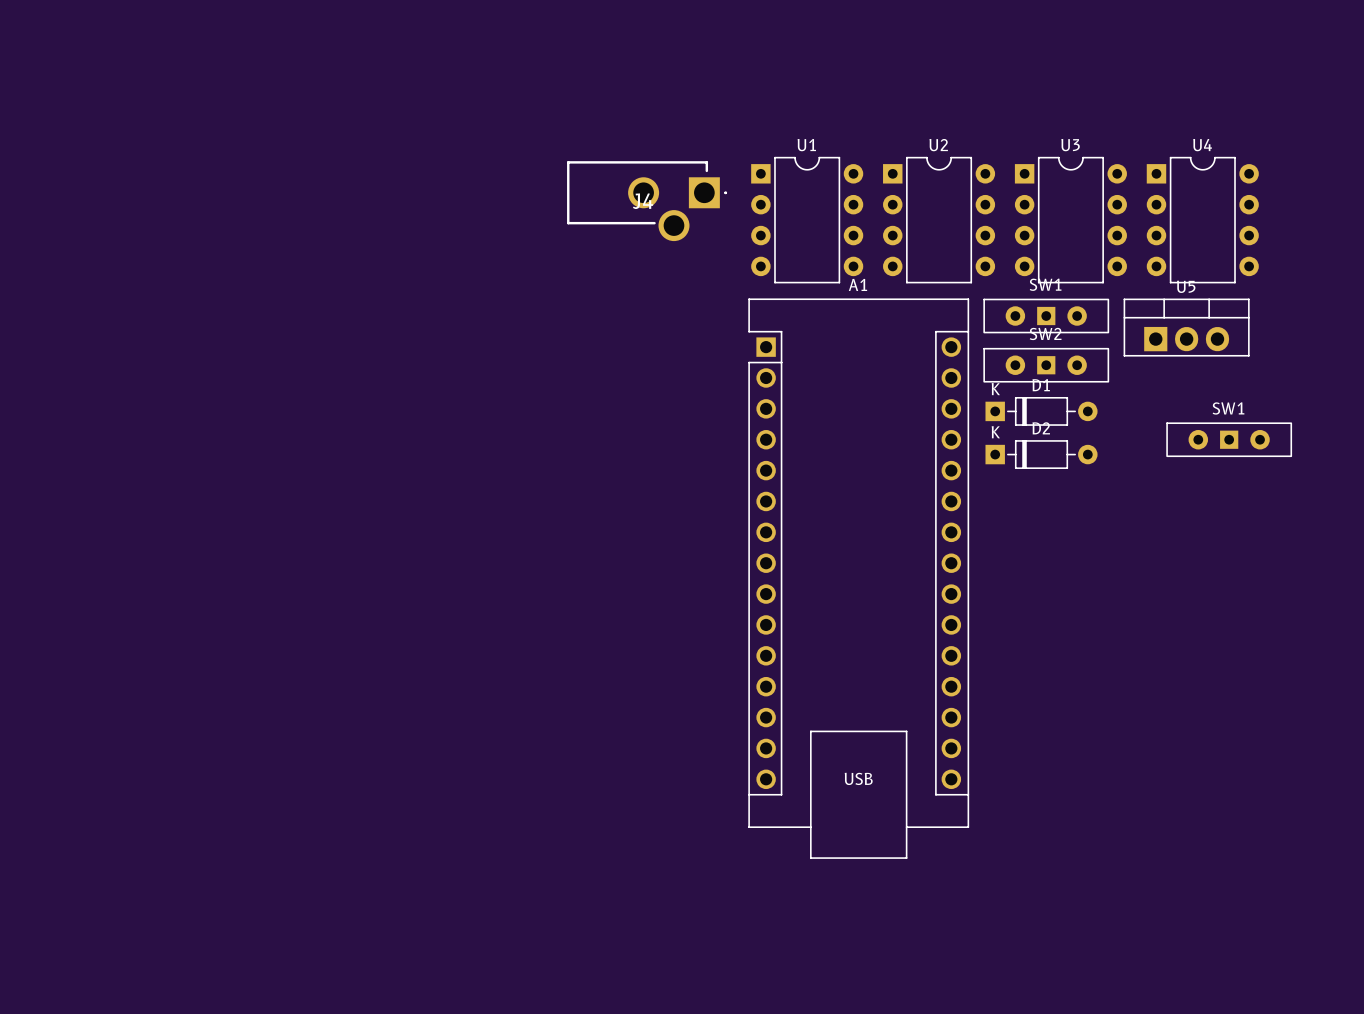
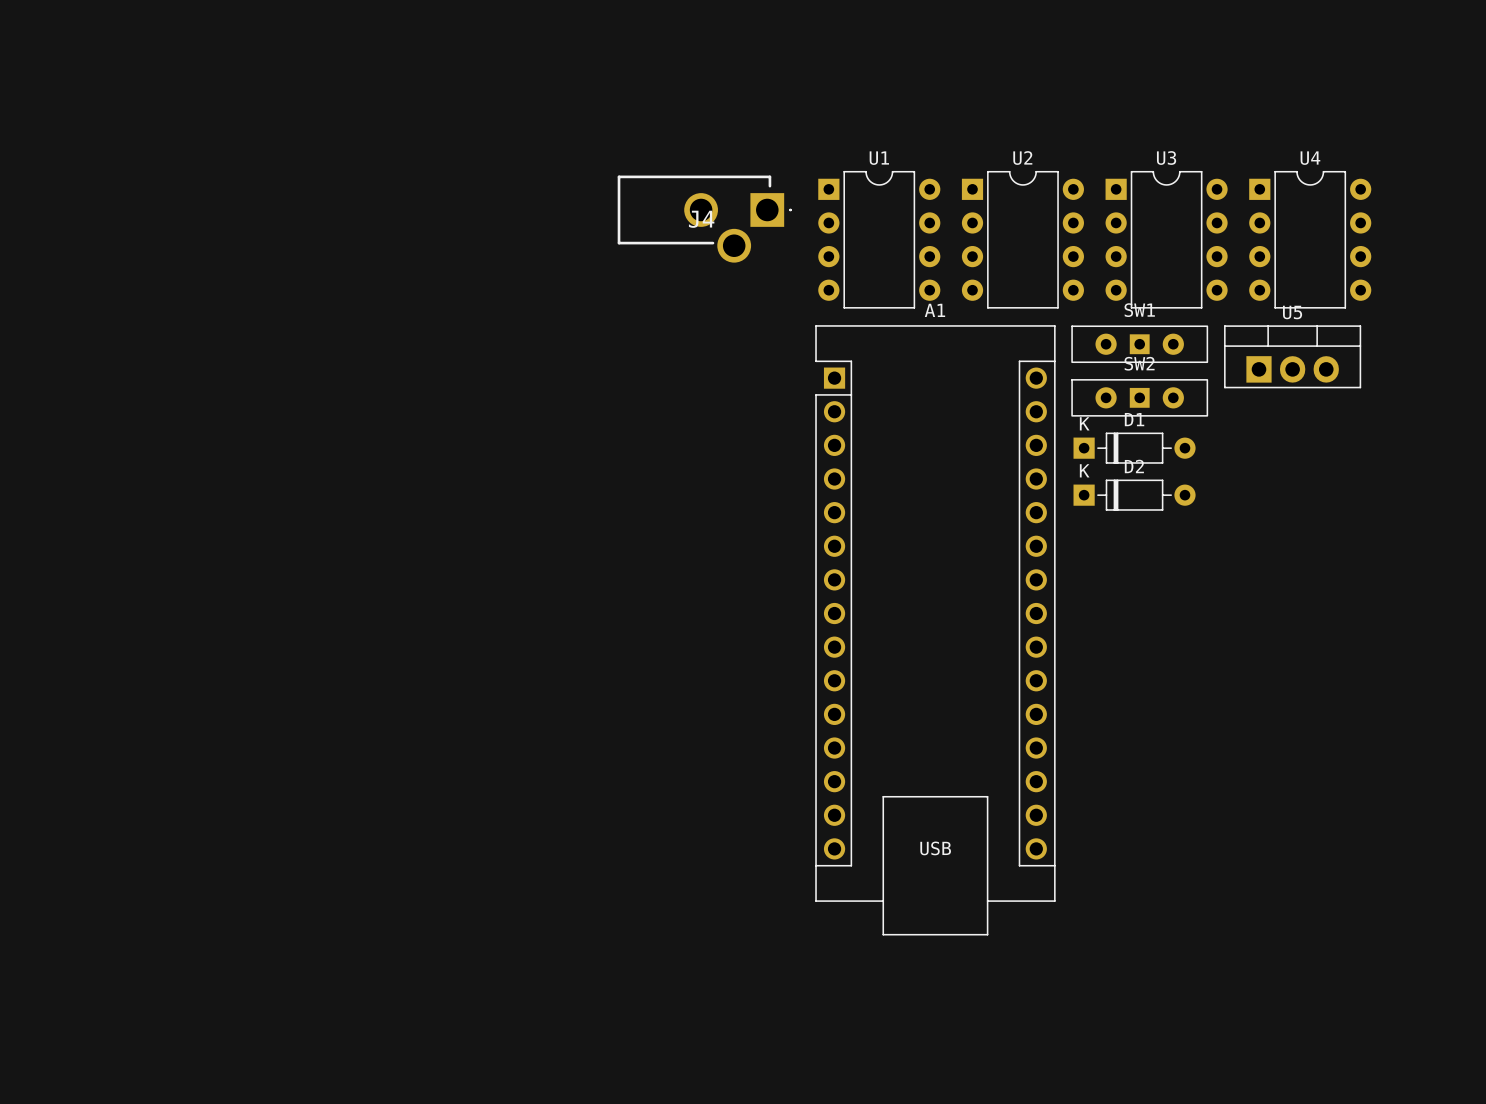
SW1: (1229, 439) -> none

